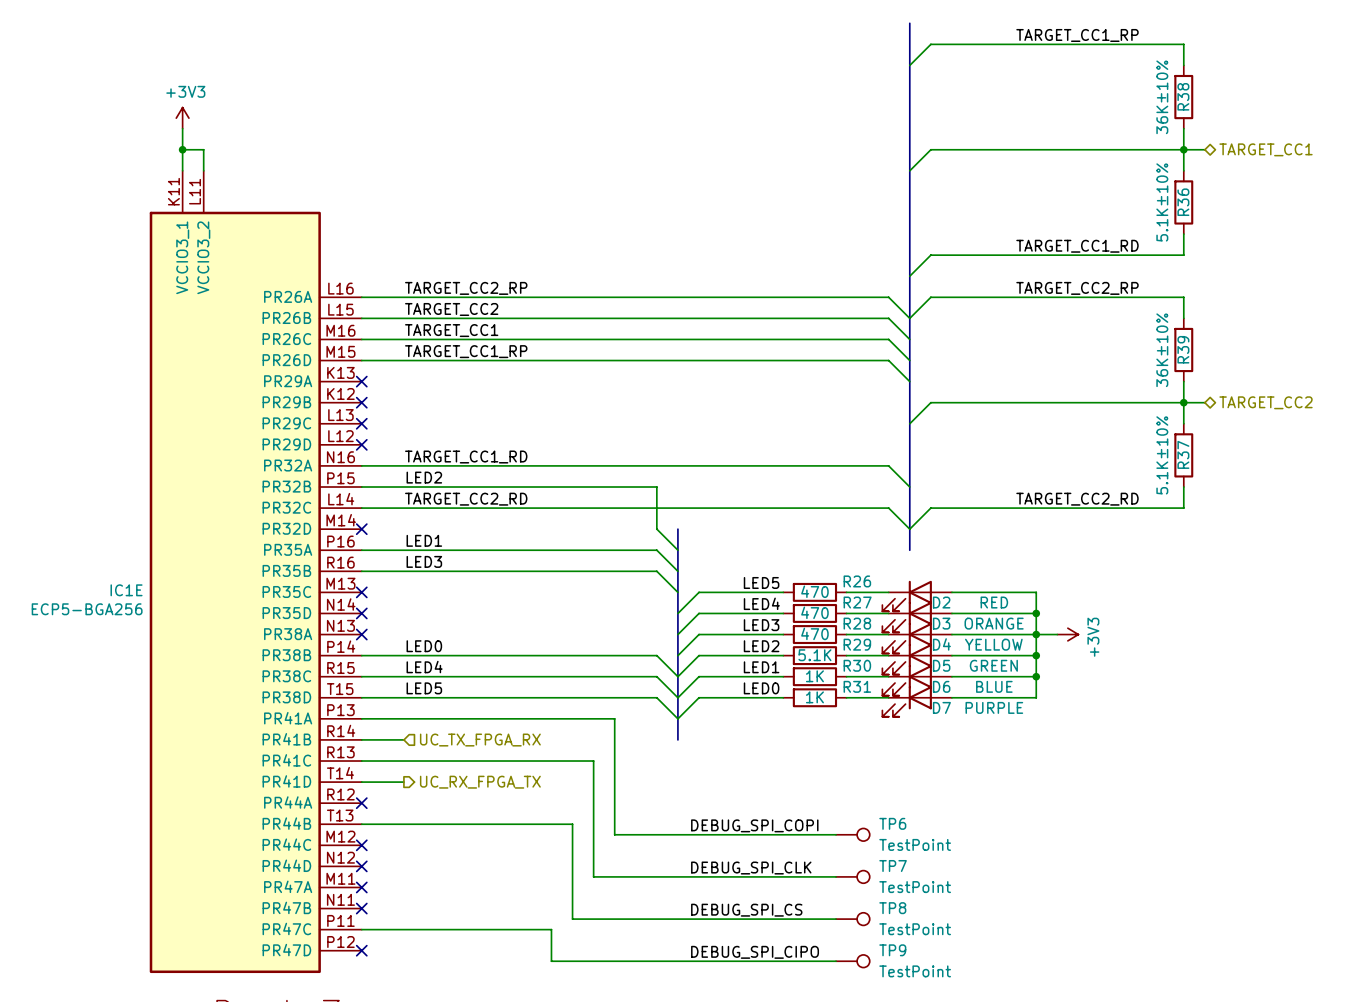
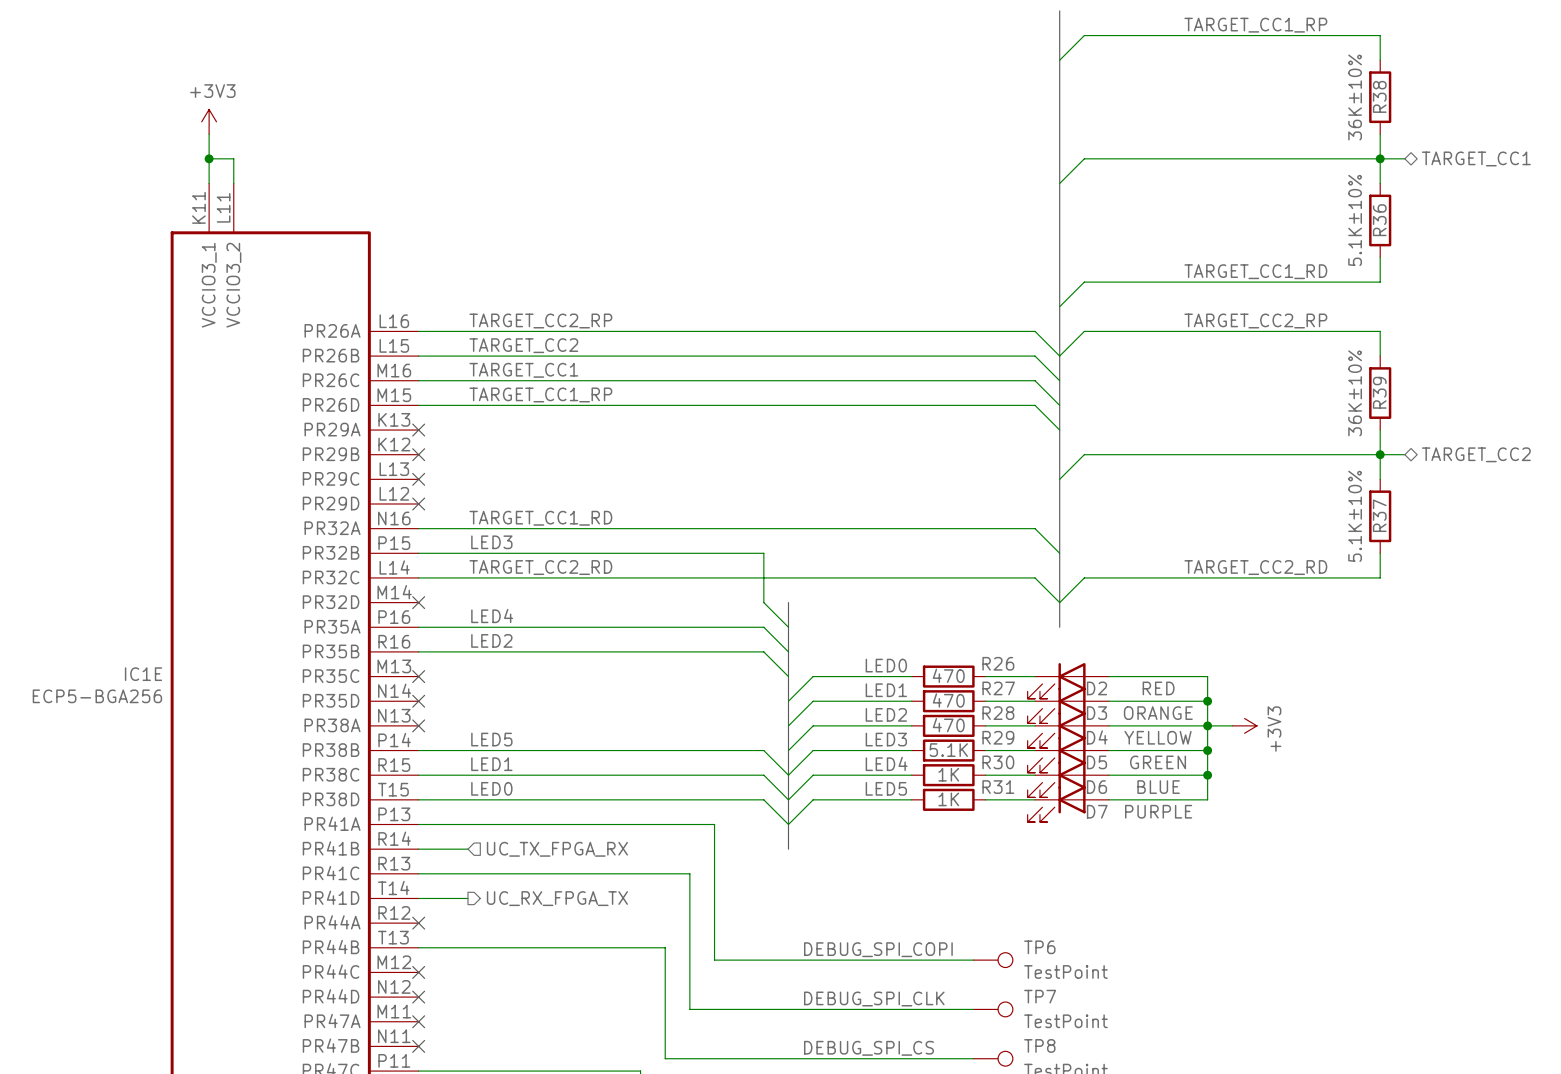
label: LED2 (424, 477) -> LED3 (491, 542)
label: LED1 (424, 540) -> LED4 (492, 615)
label: LED3 (424, 561) -> LED2 (491, 640)
label: LED5 (761, 582) -> LED0 (886, 665)
label: LED4 (761, 603) -> LED1 (886, 690)
label: LED3 (761, 625) -> LED2 (886, 714)
label: LED0 (424, 646) -> LED5 (491, 739)
label: LED2 (761, 646) -> LED3 (886, 739)
label: LED4 (424, 667) -> LED1 (491, 764)
label: LED1 (761, 667) -> LED4 (886, 763)
label: LED5 (424, 688) -> LED0 (491, 788)
label: LED0 (761, 688) -> LED5 (886, 788)

